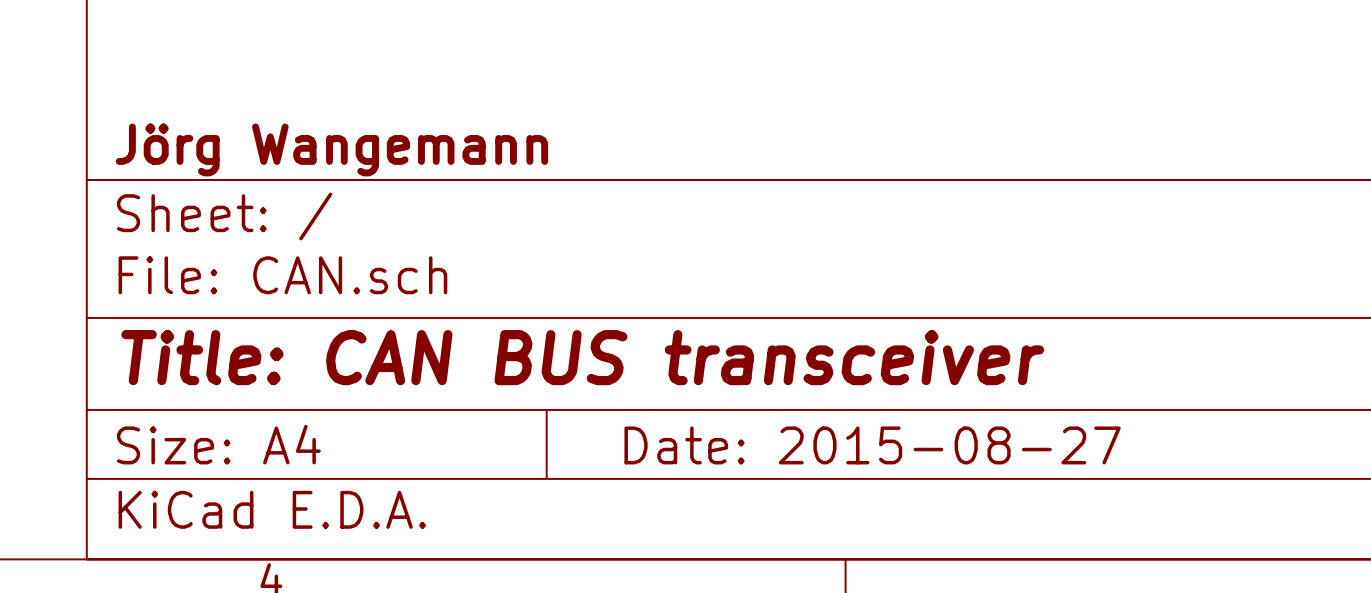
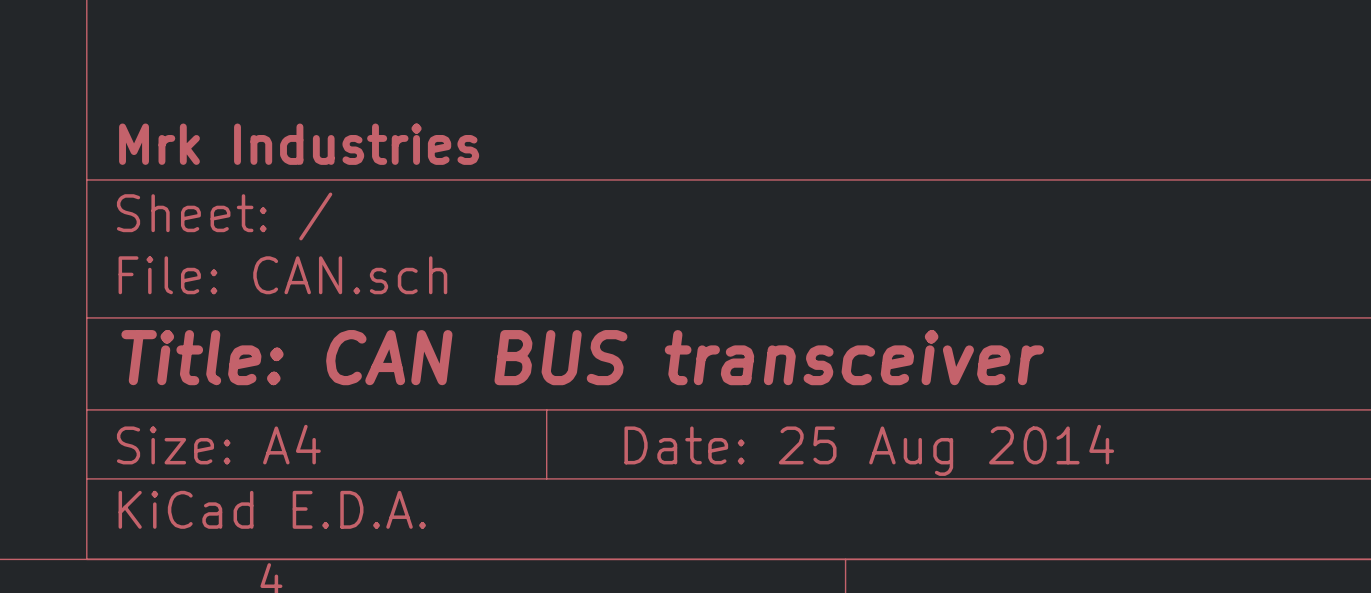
title block: Jörg Wangemann (331, 149) -> Mrk Industries (299, 144)
title block: Date: 2015-08-27 (872, 445) -> Date: 25 Aug 2014 (869, 450)

